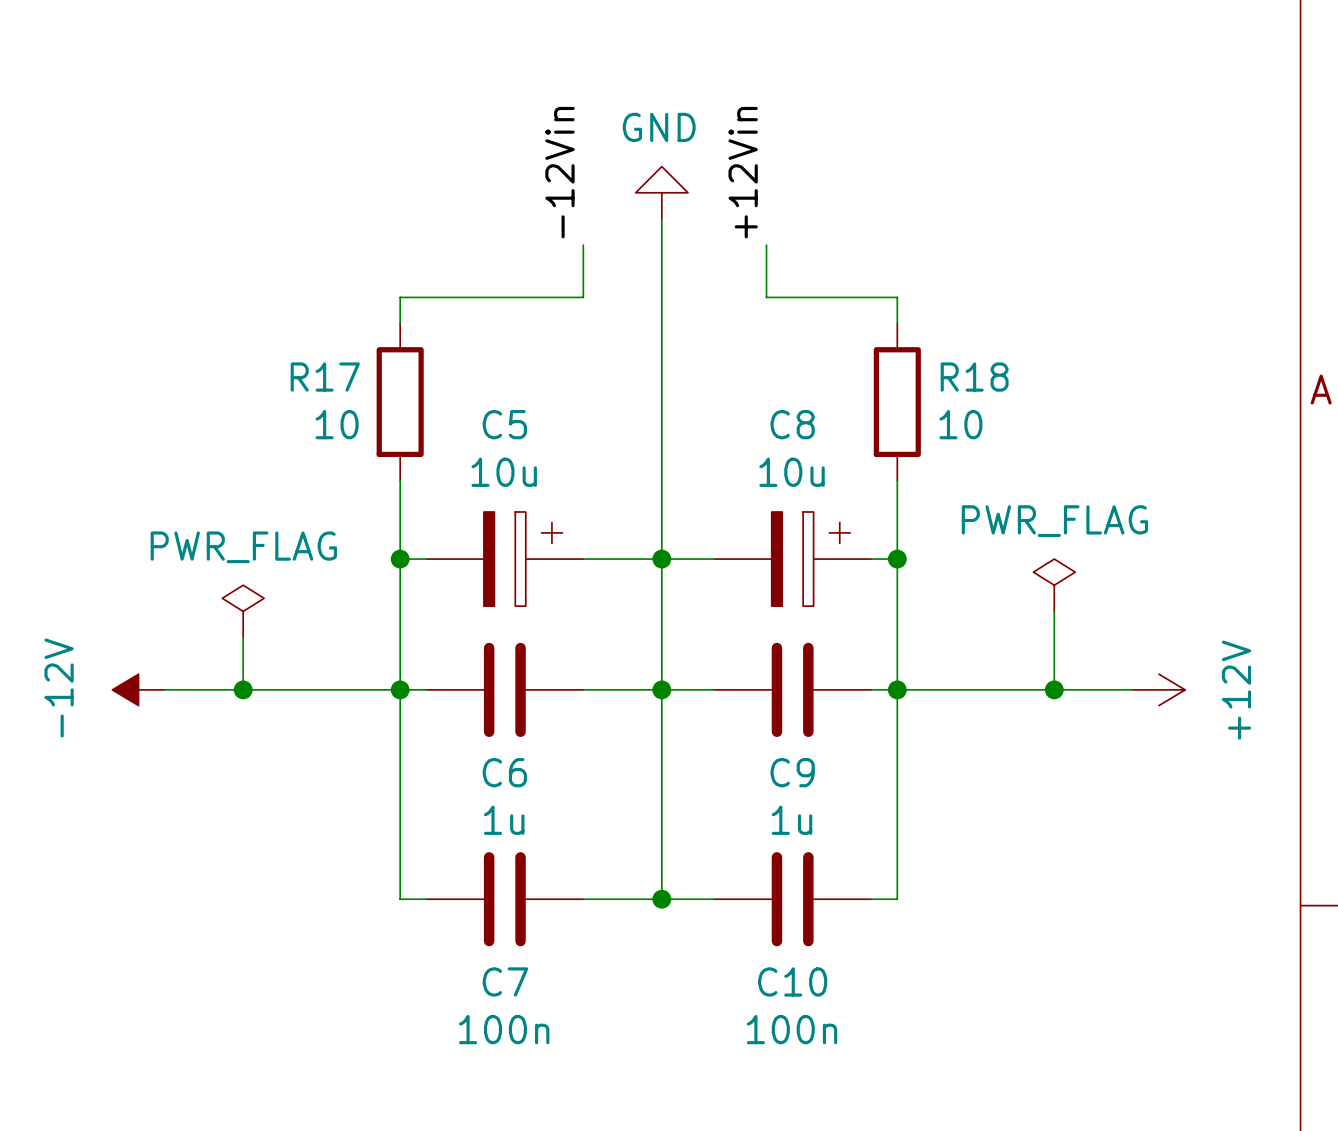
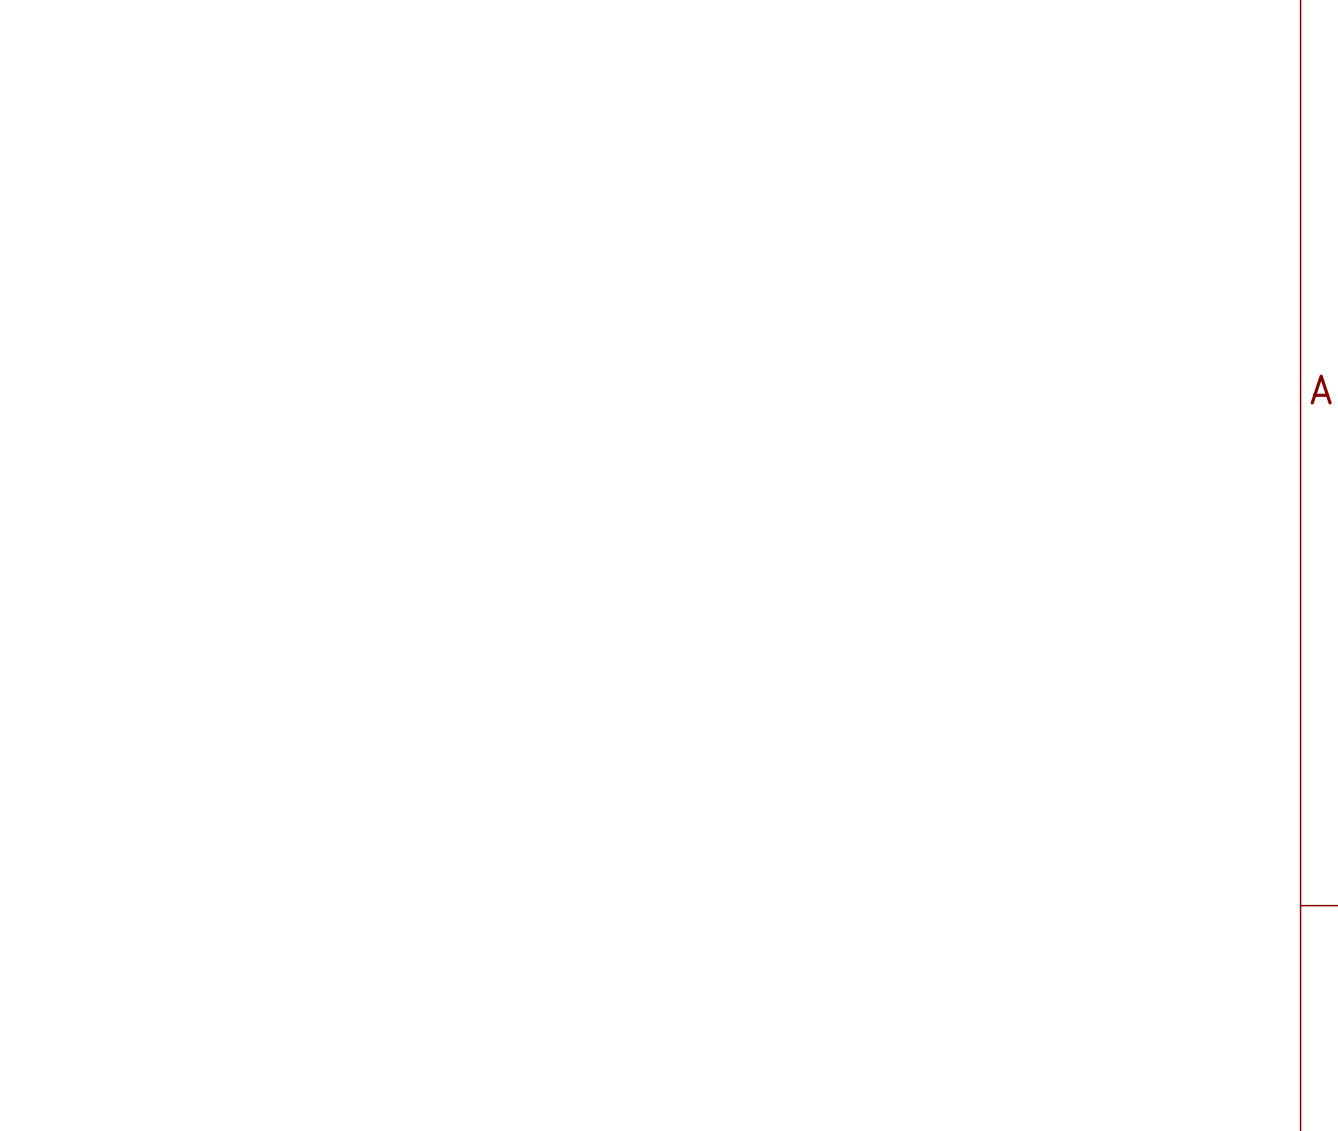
label: -12Vin (559, 172) -> none
label: +12Vin (743, 172) -> none
power symbol: GND (661, 192) -> none
wire: (661, 218) (661, 899) -> none
wire: (583, 245) (583, 297) (400, 297) (400, 323) -> none
wire: (766, 245) (766, 297) (897, 297) (897, 323) -> none
R17: 10 (400, 402) -> none
R18: 10 (897, 402) -> none
wire: (400, 480) (400, 899) (426, 899) -> none
wire: (897, 480) (897, 899) (871, 899) -> none
wire: (400, 559) (426, 559) -> none
junction: (400, 559) -> none
C5: 10u (504, 559) -> none
wire: (583, 559) (714, 559) -> none
junction: (661, 559) -> none
C8: 10u (792, 559) -> none
wire: (871, 559) (897, 559) -> none
junction: (897, 559) -> none
power symbol: PWR_FLAG (1054, 585) -> none
power symbol: PWR_FLAG (243, 611) -> none
wire: (1054, 611) (1054, 689) -> none
wire: (243, 637) (243, 689) -> none
power symbol: -12V (138, 689) -> none
wire: (164, 689) (426, 689) -> none
junction: (243, 689) -> none
junction: (400, 689) -> none
C6: 1u (504, 689) -> none
wire: (583, 689) (714, 689) -> none
junction: (661, 689) -> none
C9: 1u (792, 689) -> none
wire: (871, 689) (1132, 689) -> none
junction: (897, 689) -> none
junction: (1054, 689) -> none
power symbol: +12V (1158, 689) -> none
C7: 100n (504, 899) -> none
wire: (583, 899) (714, 899) -> none
junction: (661, 899) -> none
C10: 100n (792, 899) -> none

